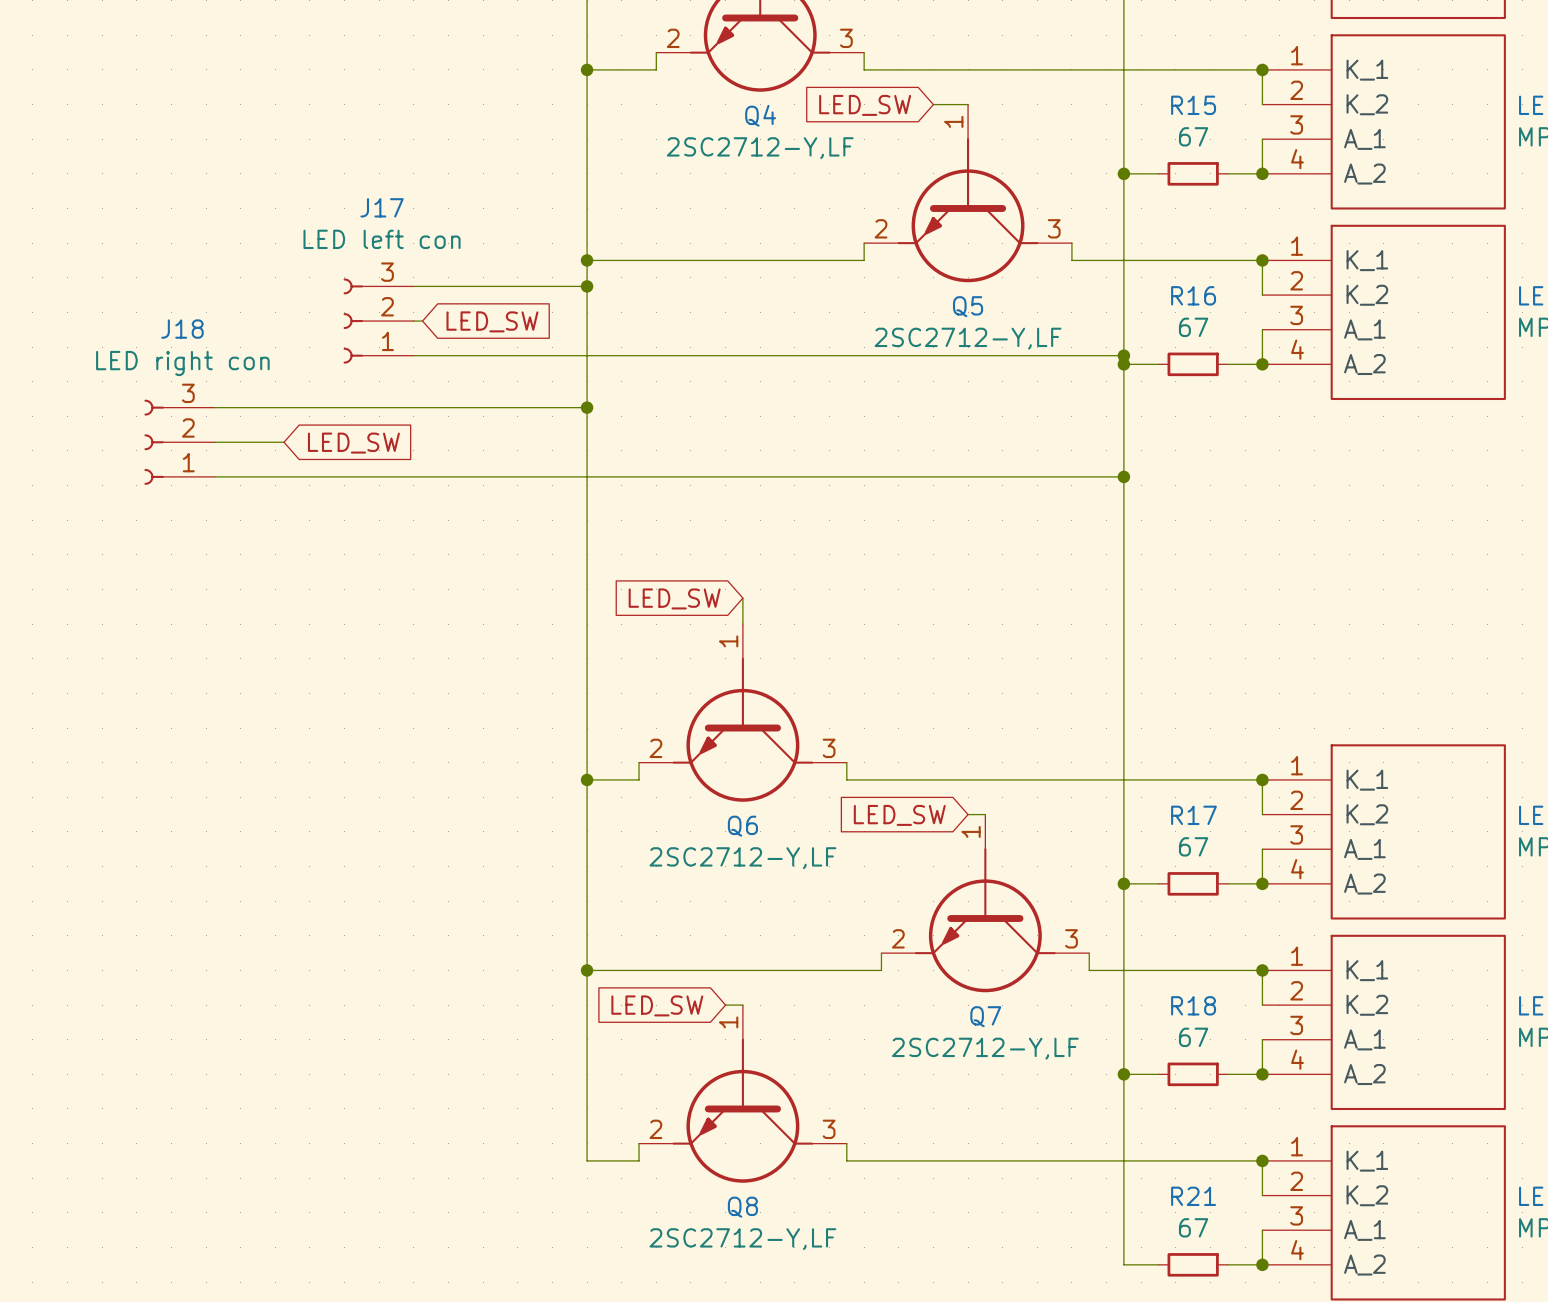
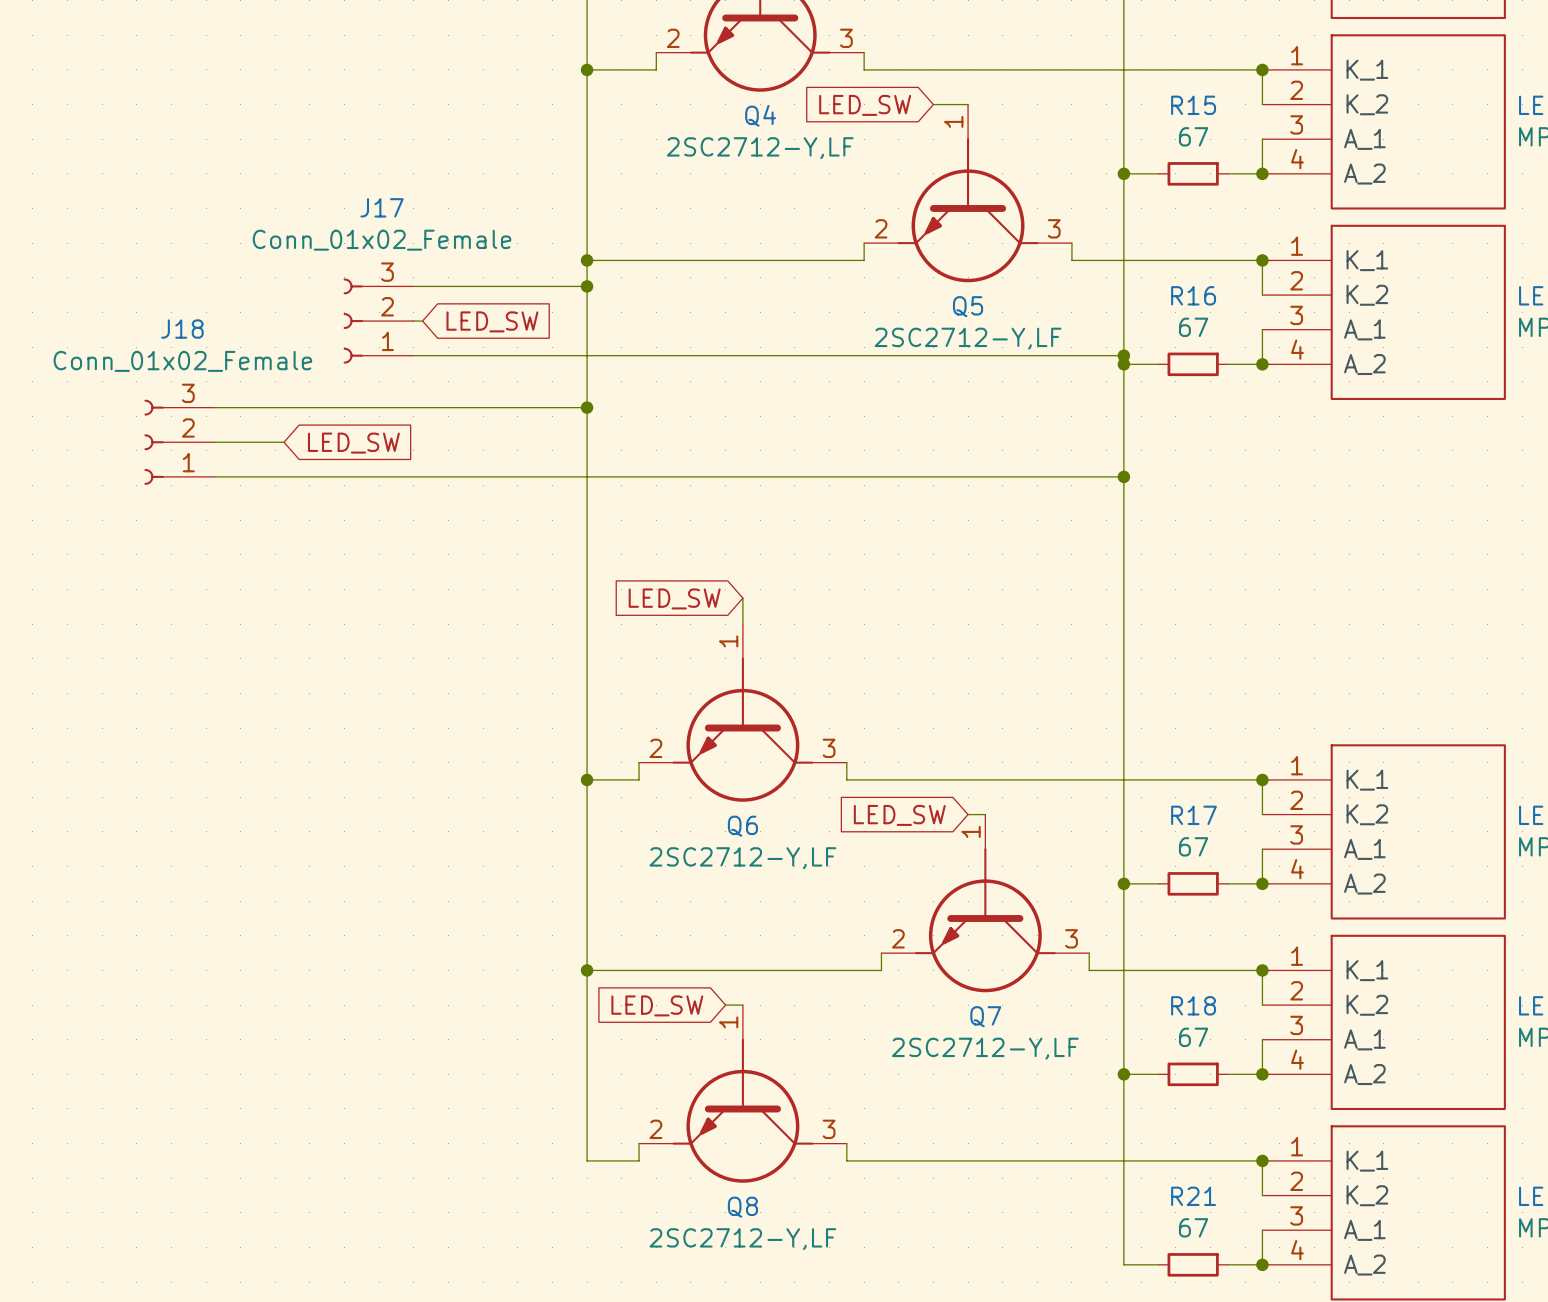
J17 value: LED left con (382, 239) -> Conn_01x02_Female (382, 240)
J18 value: LED right con (182, 363) -> Conn_01x02_Female (182, 361)

